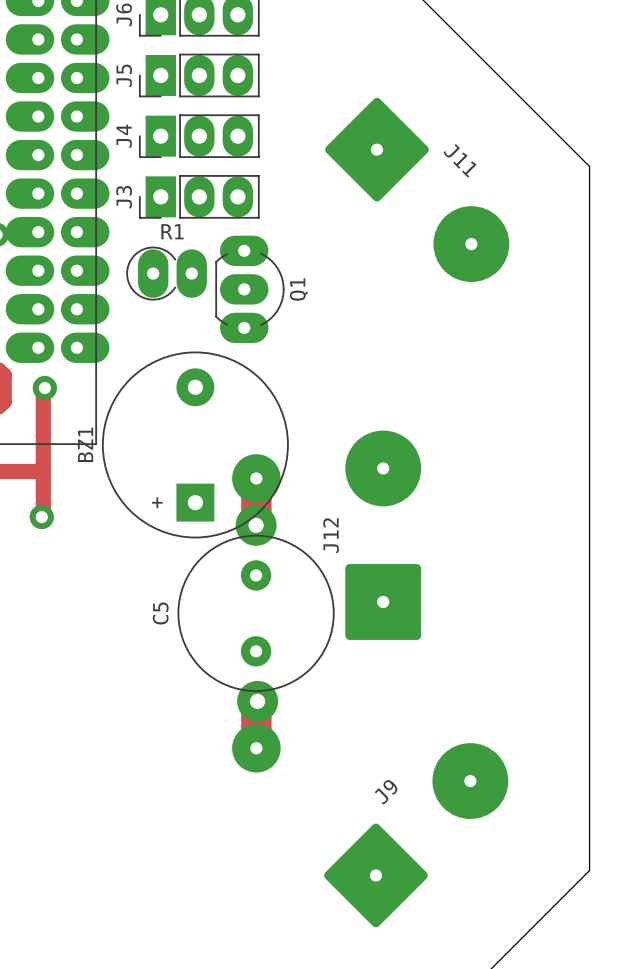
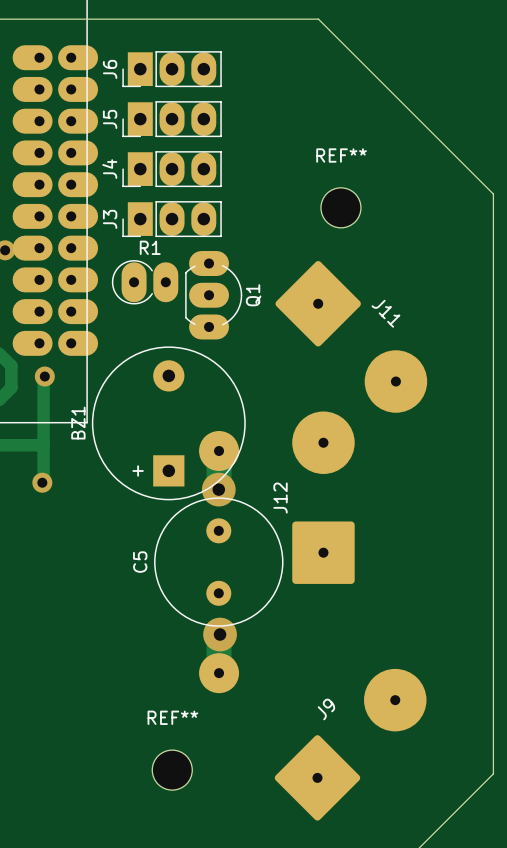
REF**: none -> (340, 207)
J11 position: (417, 189) -> (351, 336)
REF**: none -> (172, 770)

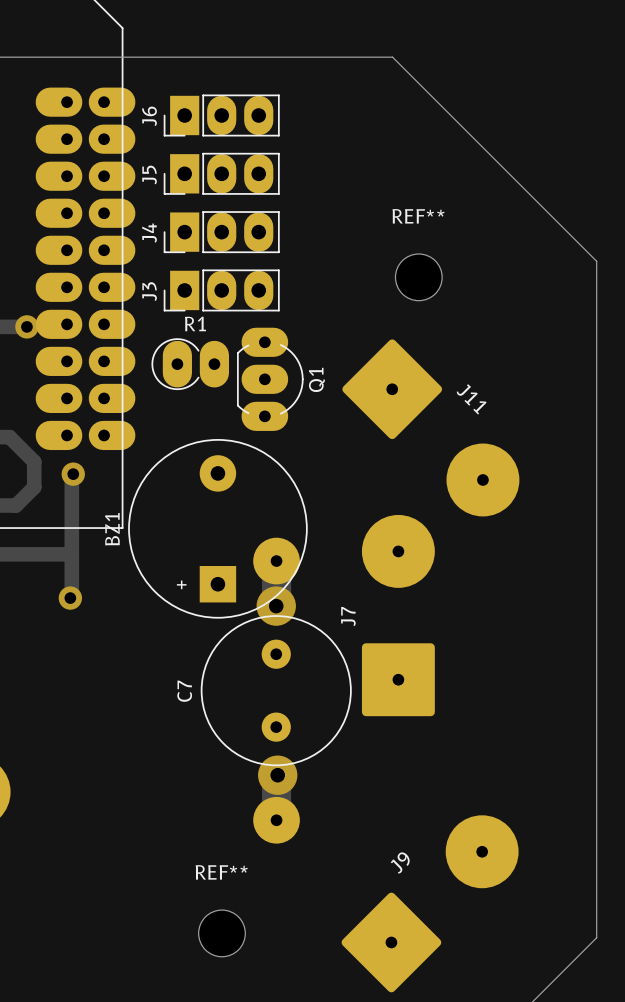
J12 name: J12 (280, 498) -> J7 (348, 616)
C5 name: C5 (140, 562) -> C7 (184, 691)

